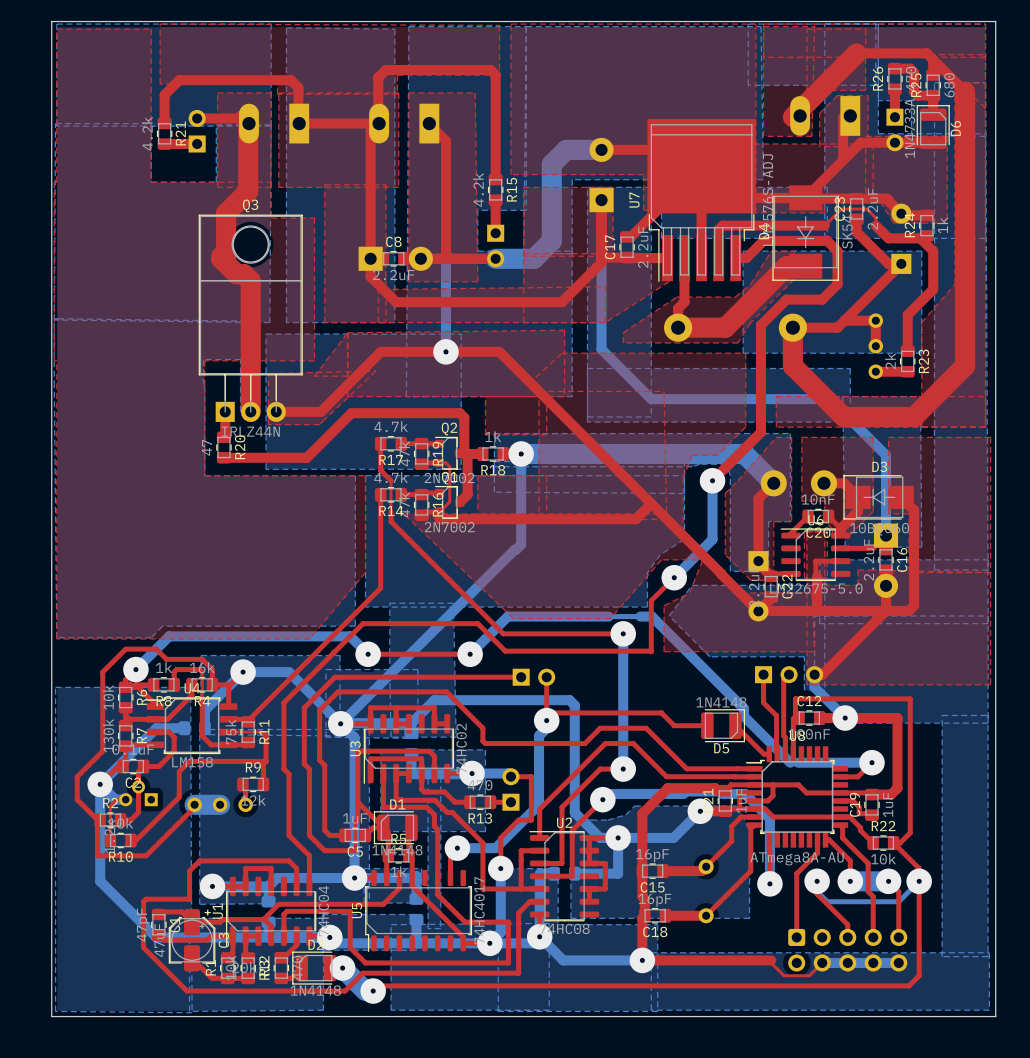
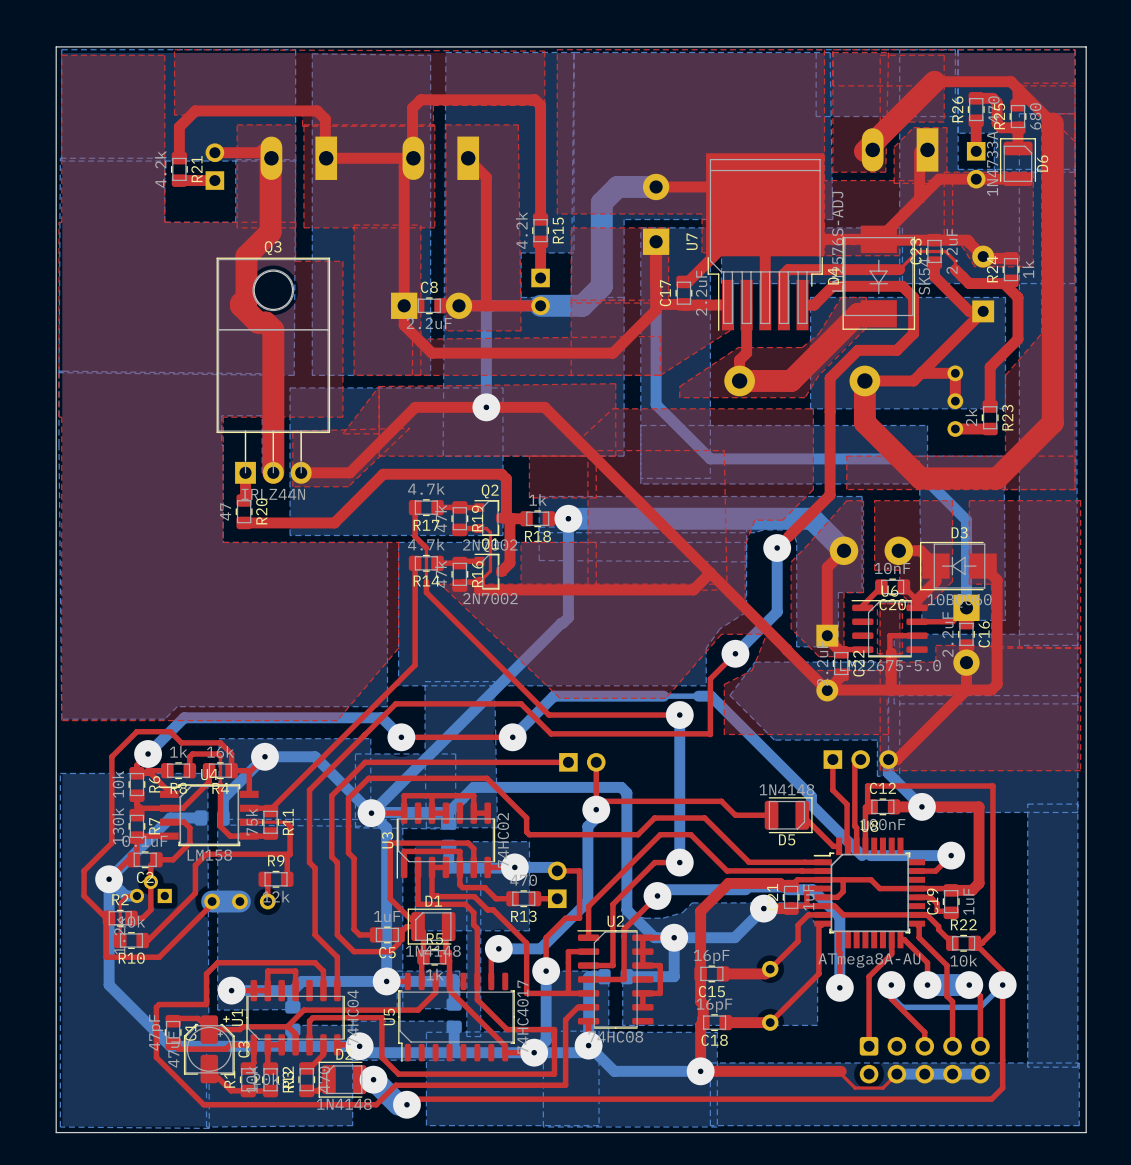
top track: (357, 802) (355, 850) -> (398, 934) (398, 943) (390, 951) (387, 951)

